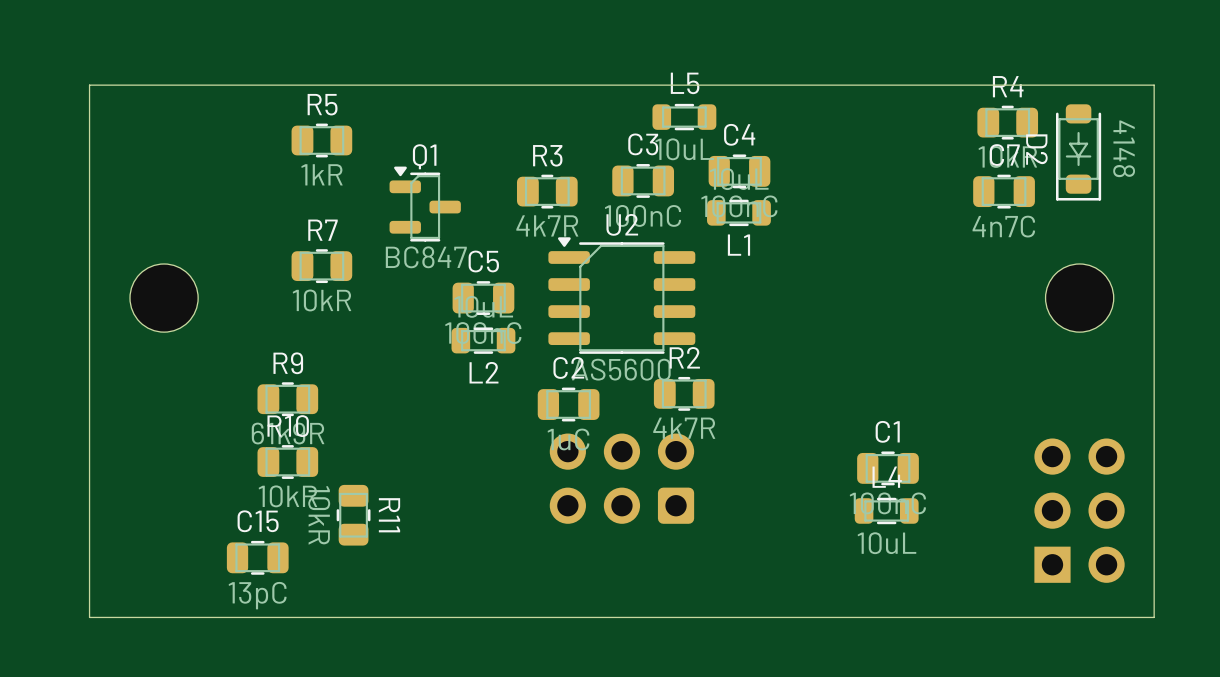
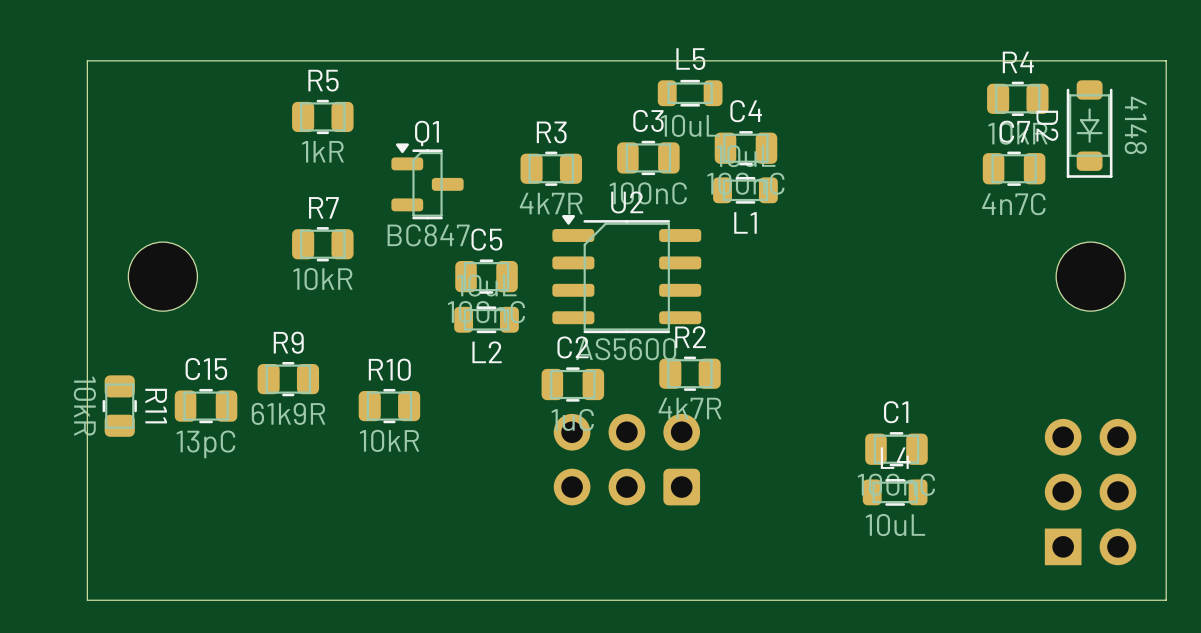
R10 position: (287, 462) -> (389, 406)
R11 position: (353, 515) -> (119, 406)
C15 position: (257, 557) -> (206, 406)

